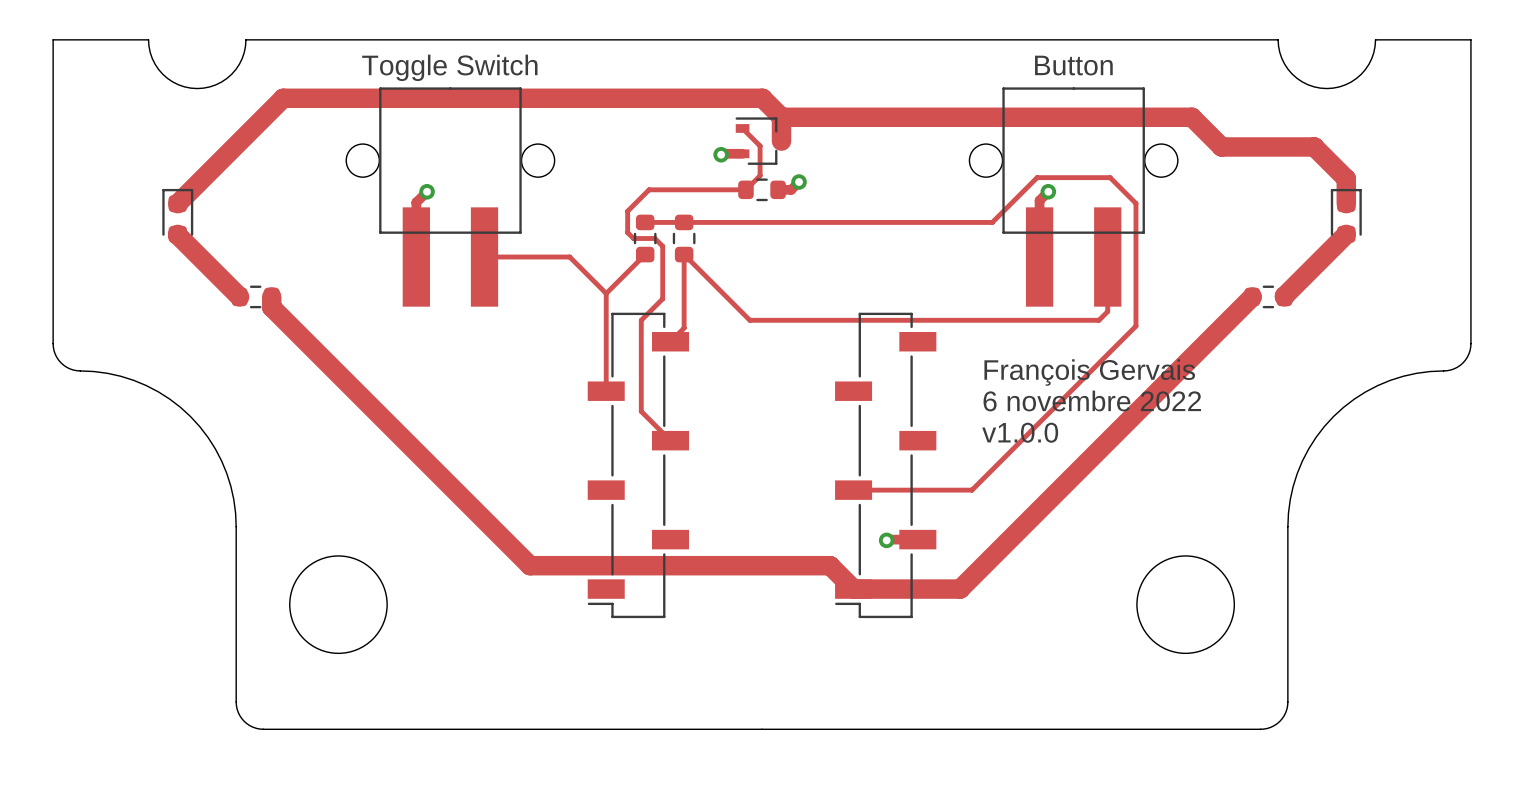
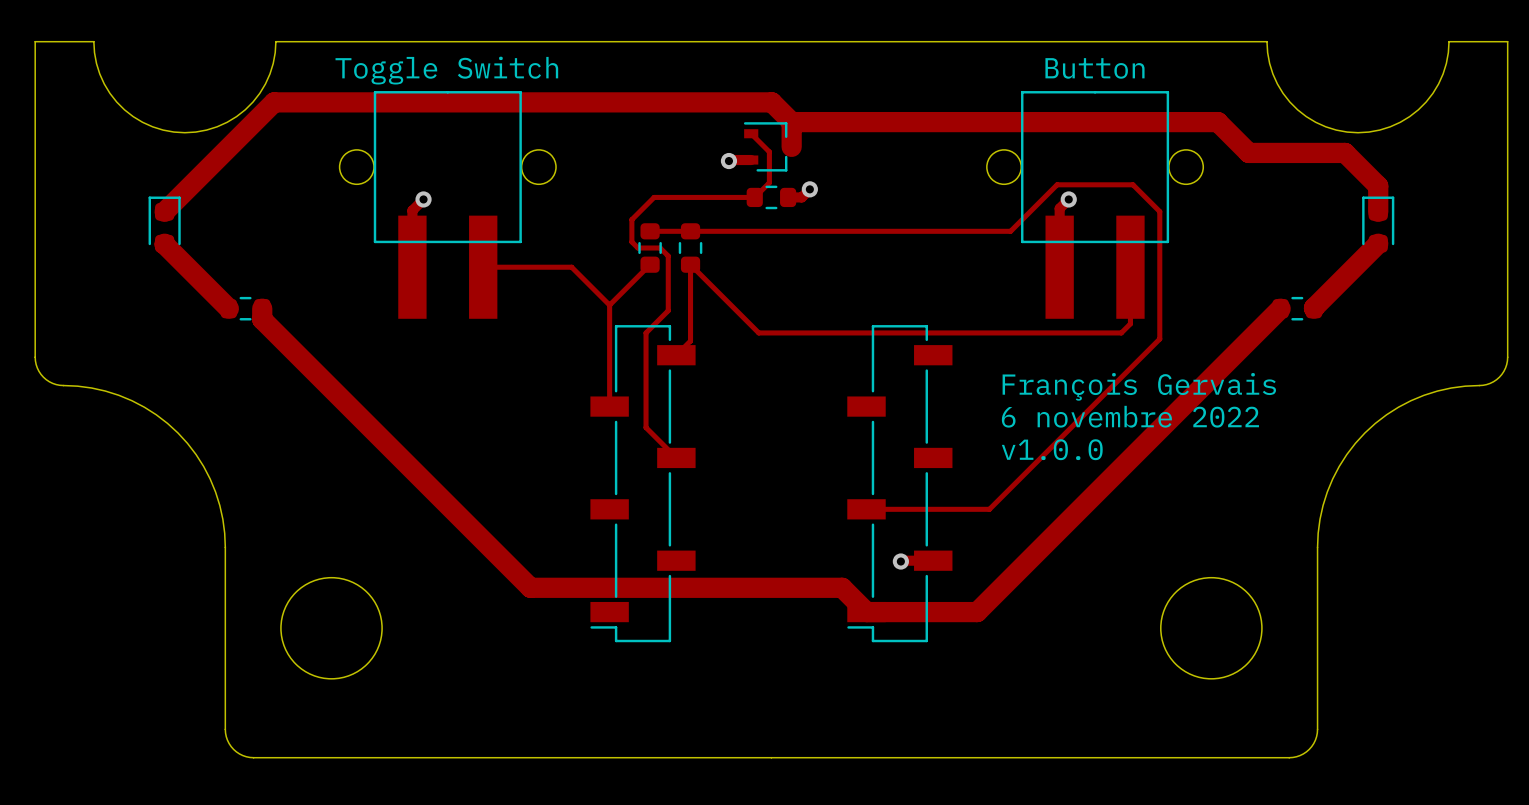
board edge: (109, 39) (148, 39) (152, 58) (162, 74) (178, 84) (197, 88) (215, 84) (231, 74) (242, 58) (245, 39) (284, 39) -> (93, 41) (99, 73) (116, 102) (142, 122) (163, 130) (184, 132) (206, 130) (227, 122) (253, 102) (269, 73) (275, 41)
board edge: (1239, 39) (1278, 39) (1281, 58) (1292, 74) (1308, 84) (1326, 88) (1345, 84) (1361, 74) (1371, 58) (1375, 39) (1414, 39) -> (1266, 41) (1272, 73) (1283, 93) (1297, 109) (1325, 126) (1358, 132) (1390, 126) (1418, 109) (1438, 83) (1446, 63) (1449, 41)

